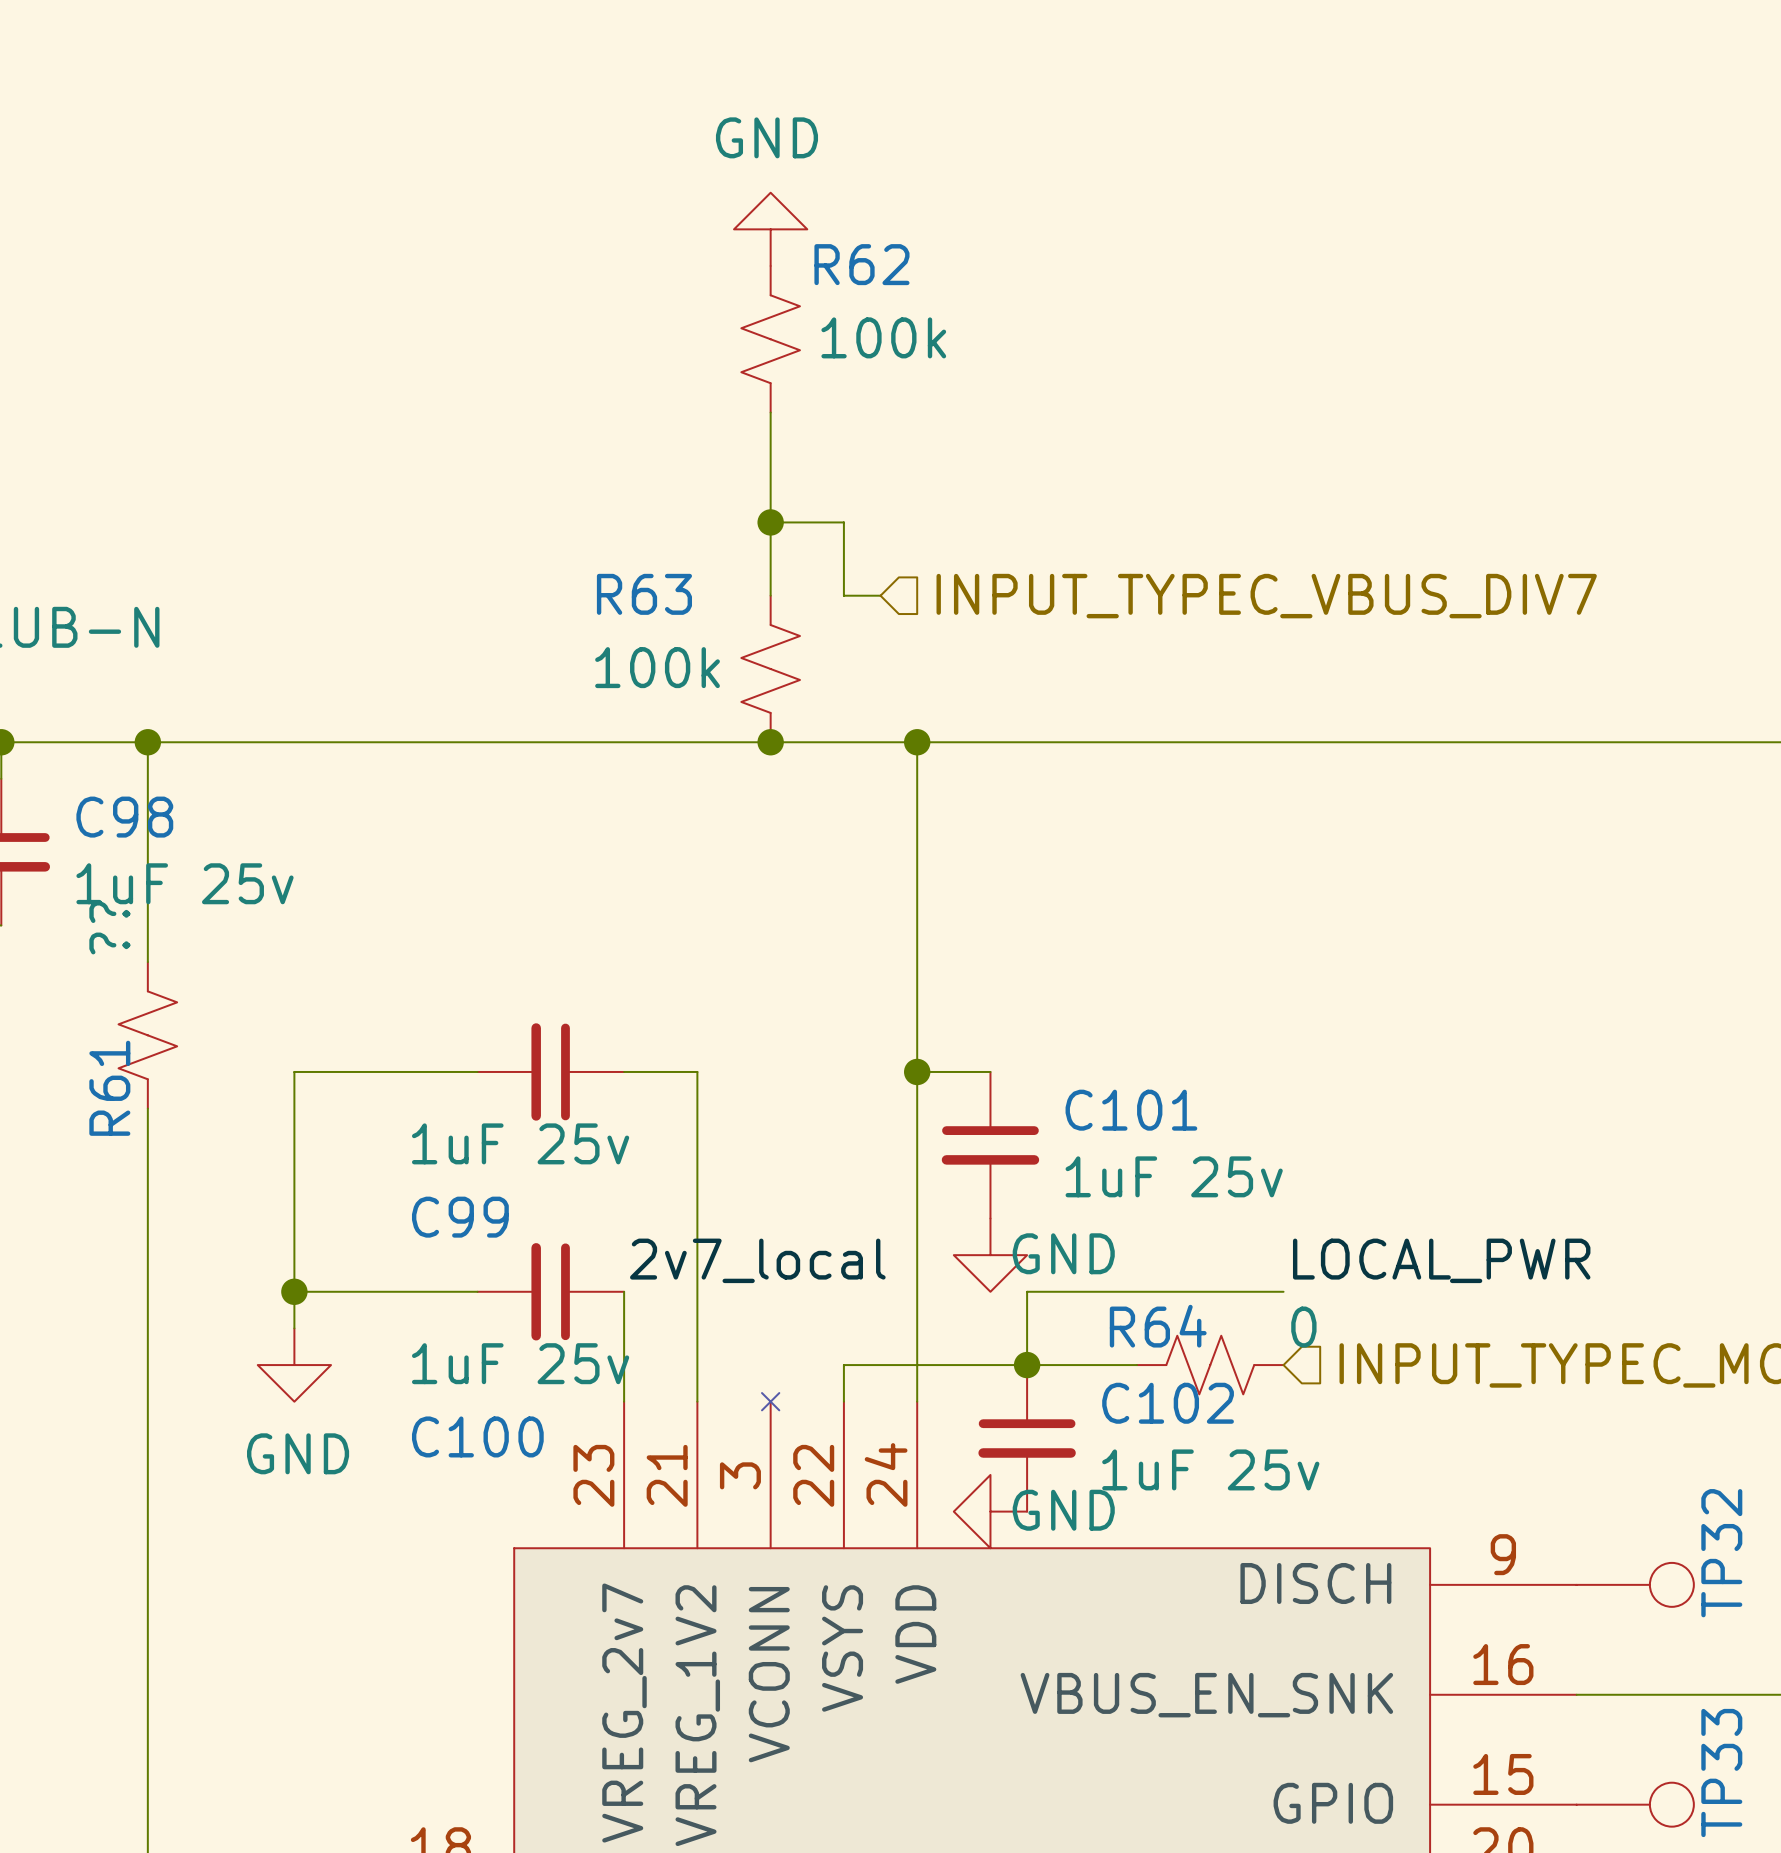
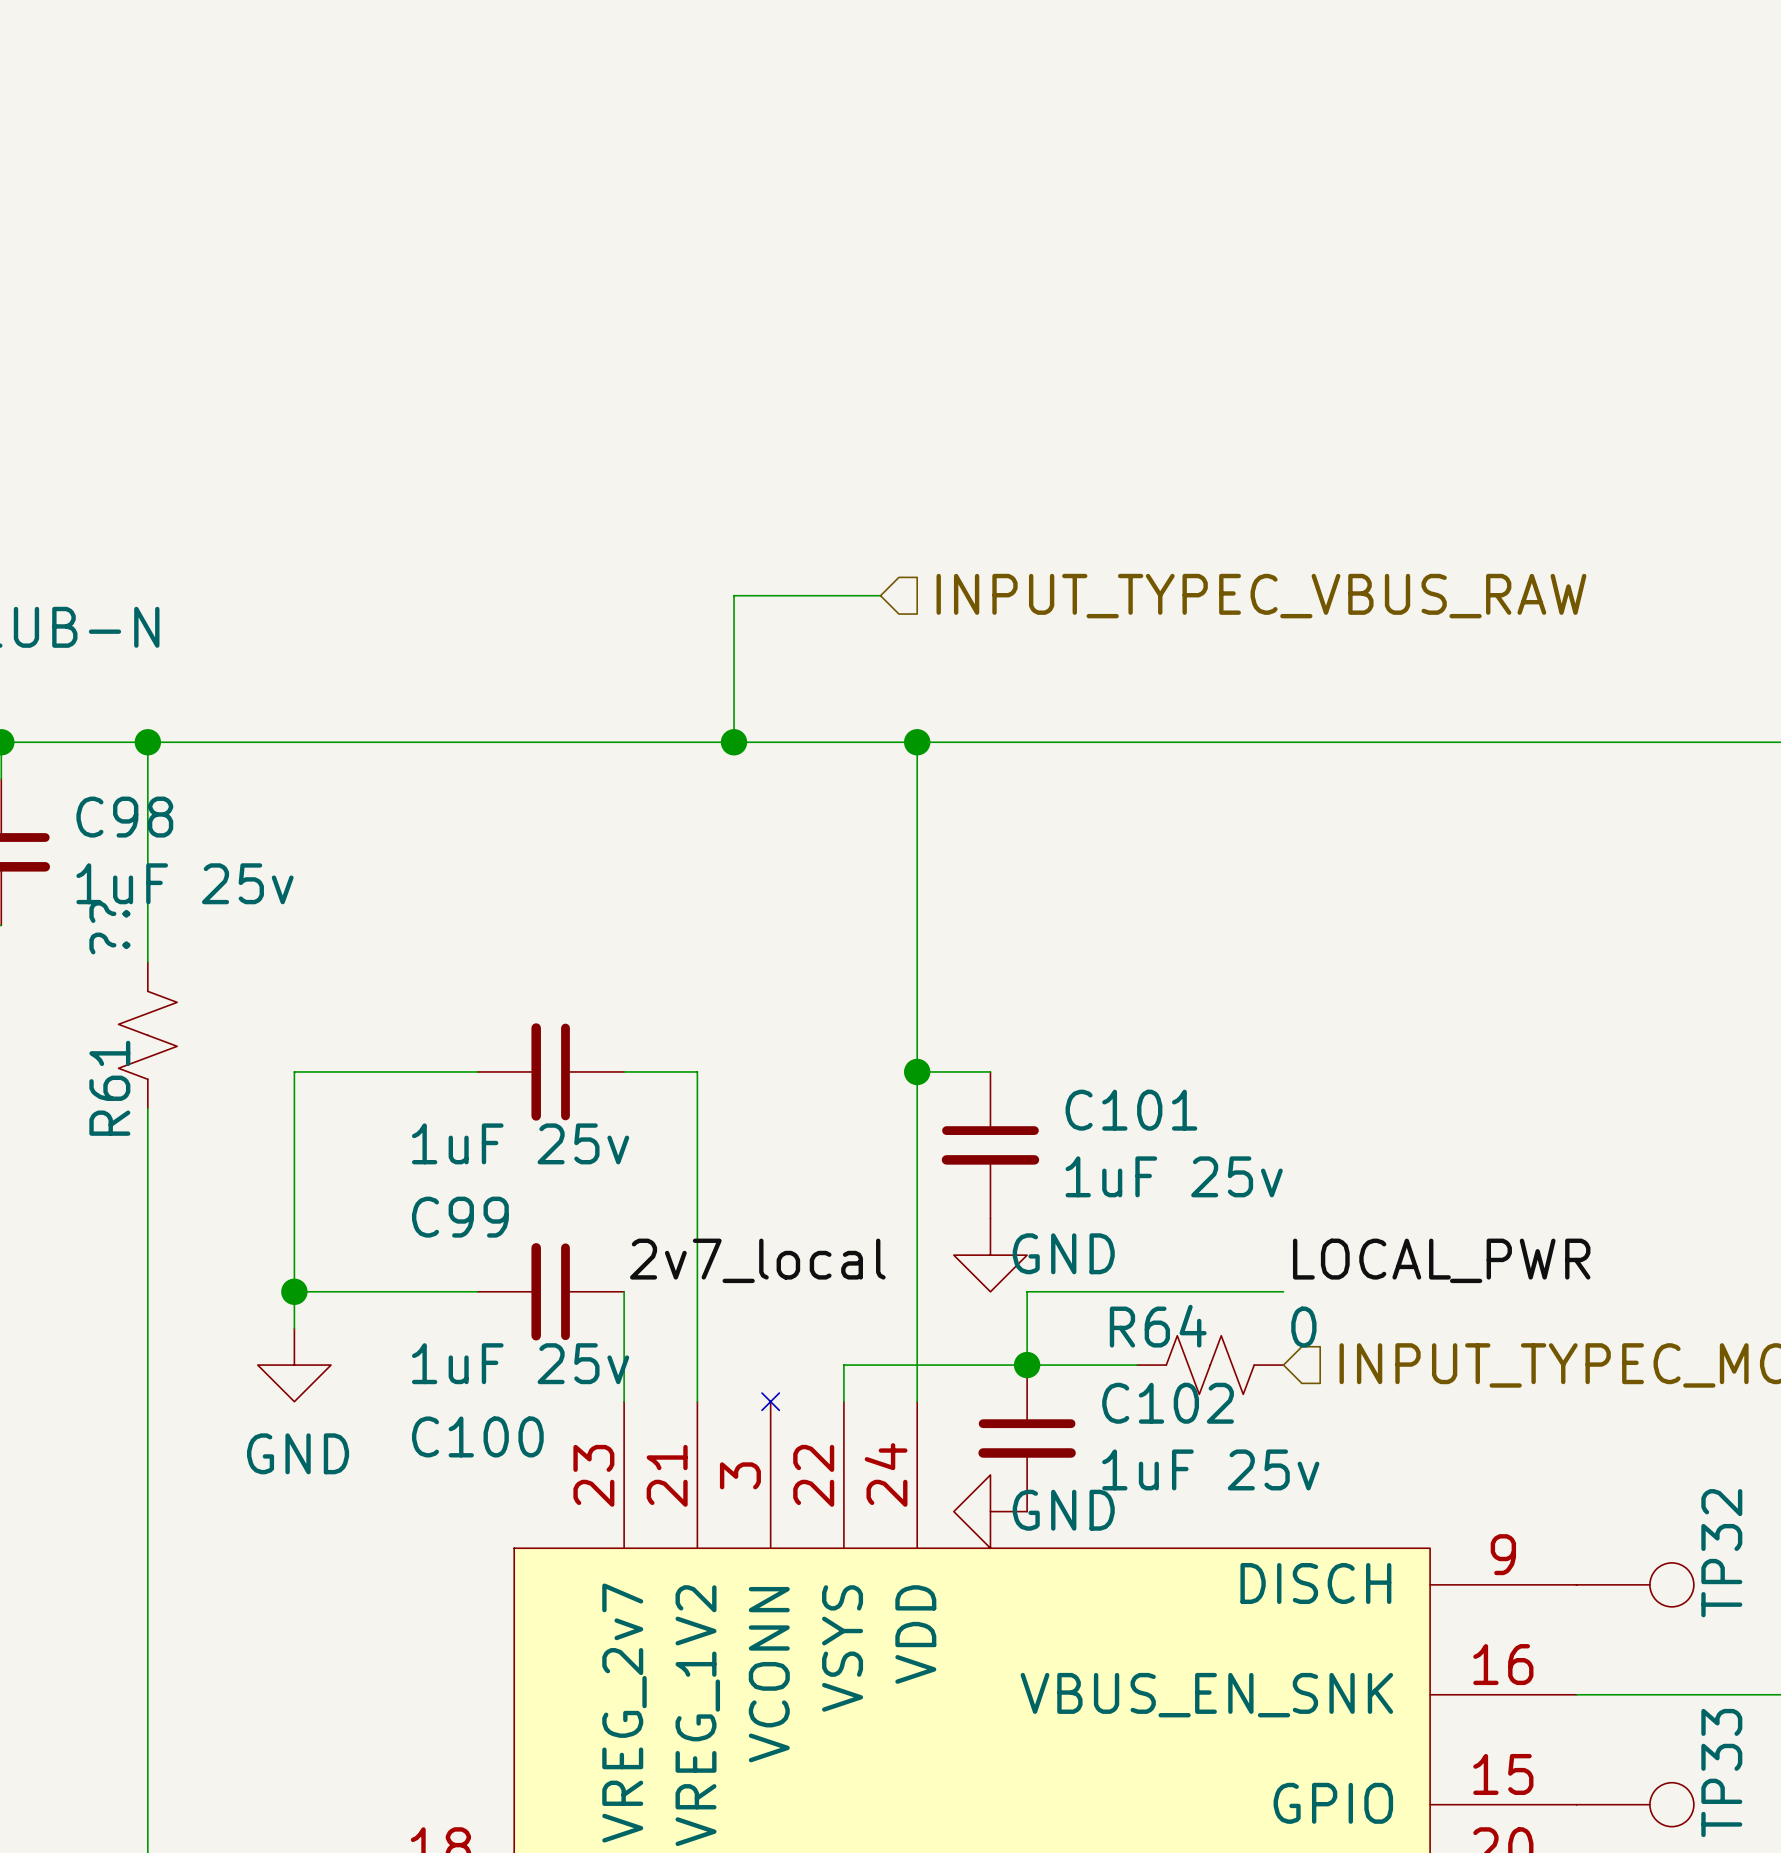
power symbol: GND (770, 229) -> none
R62: 100k (770, 339) -> none
wire: (770, 412) (770, 595) -> none
wire: (770, 522) (843, 522) (843, 595) -> (734, 742) (734, 595) (843, 595)
junction: (770, 522) -> none
hierarchical label: INPUT_TYPEC_VBUS_DIV7 (1266, 596) -> INPUT_TYPEC_VBUS_RAW (1261, 596)
R63: 100k (770, 668) -> none
junction position: (770, 742) -> (734, 742)

